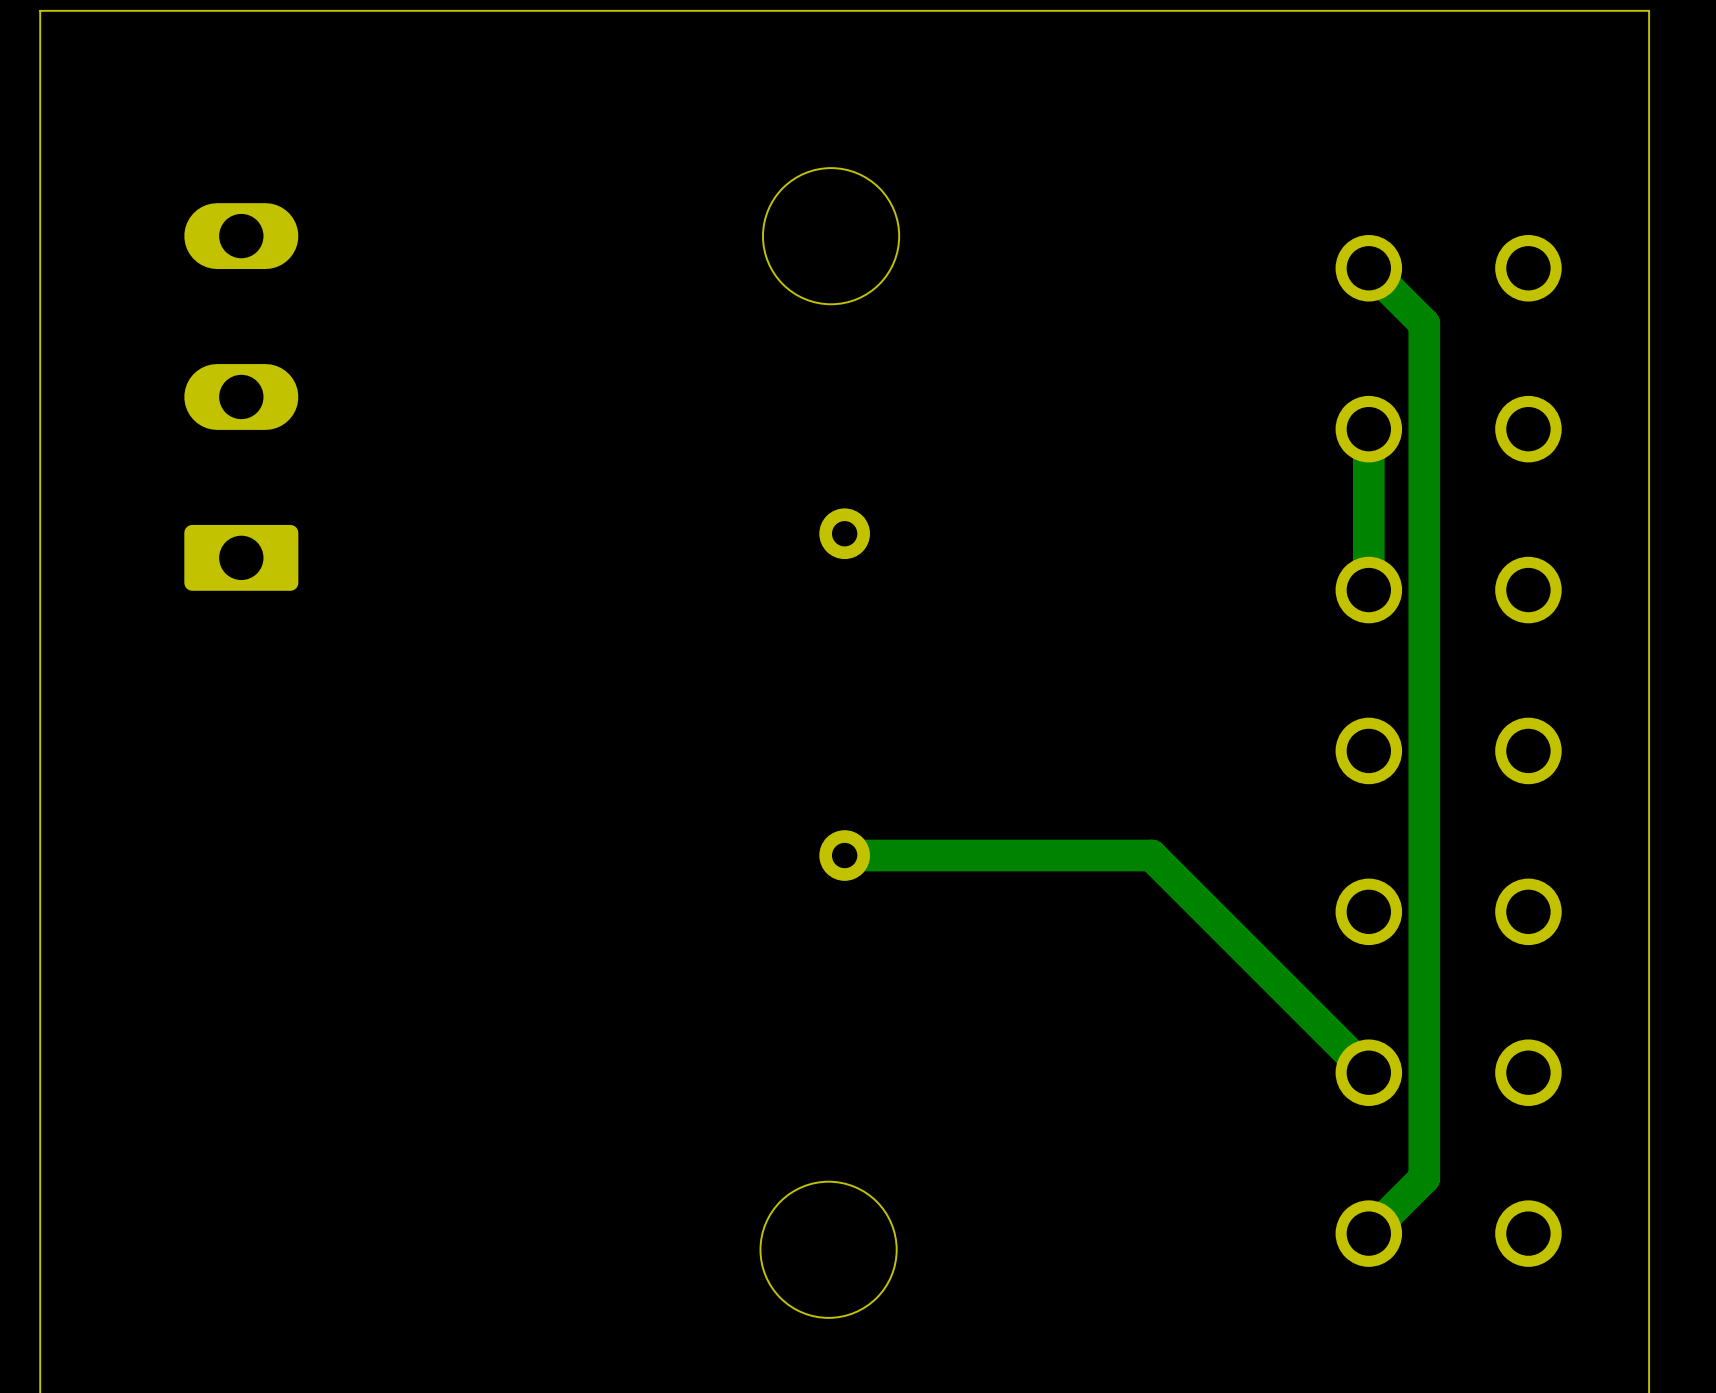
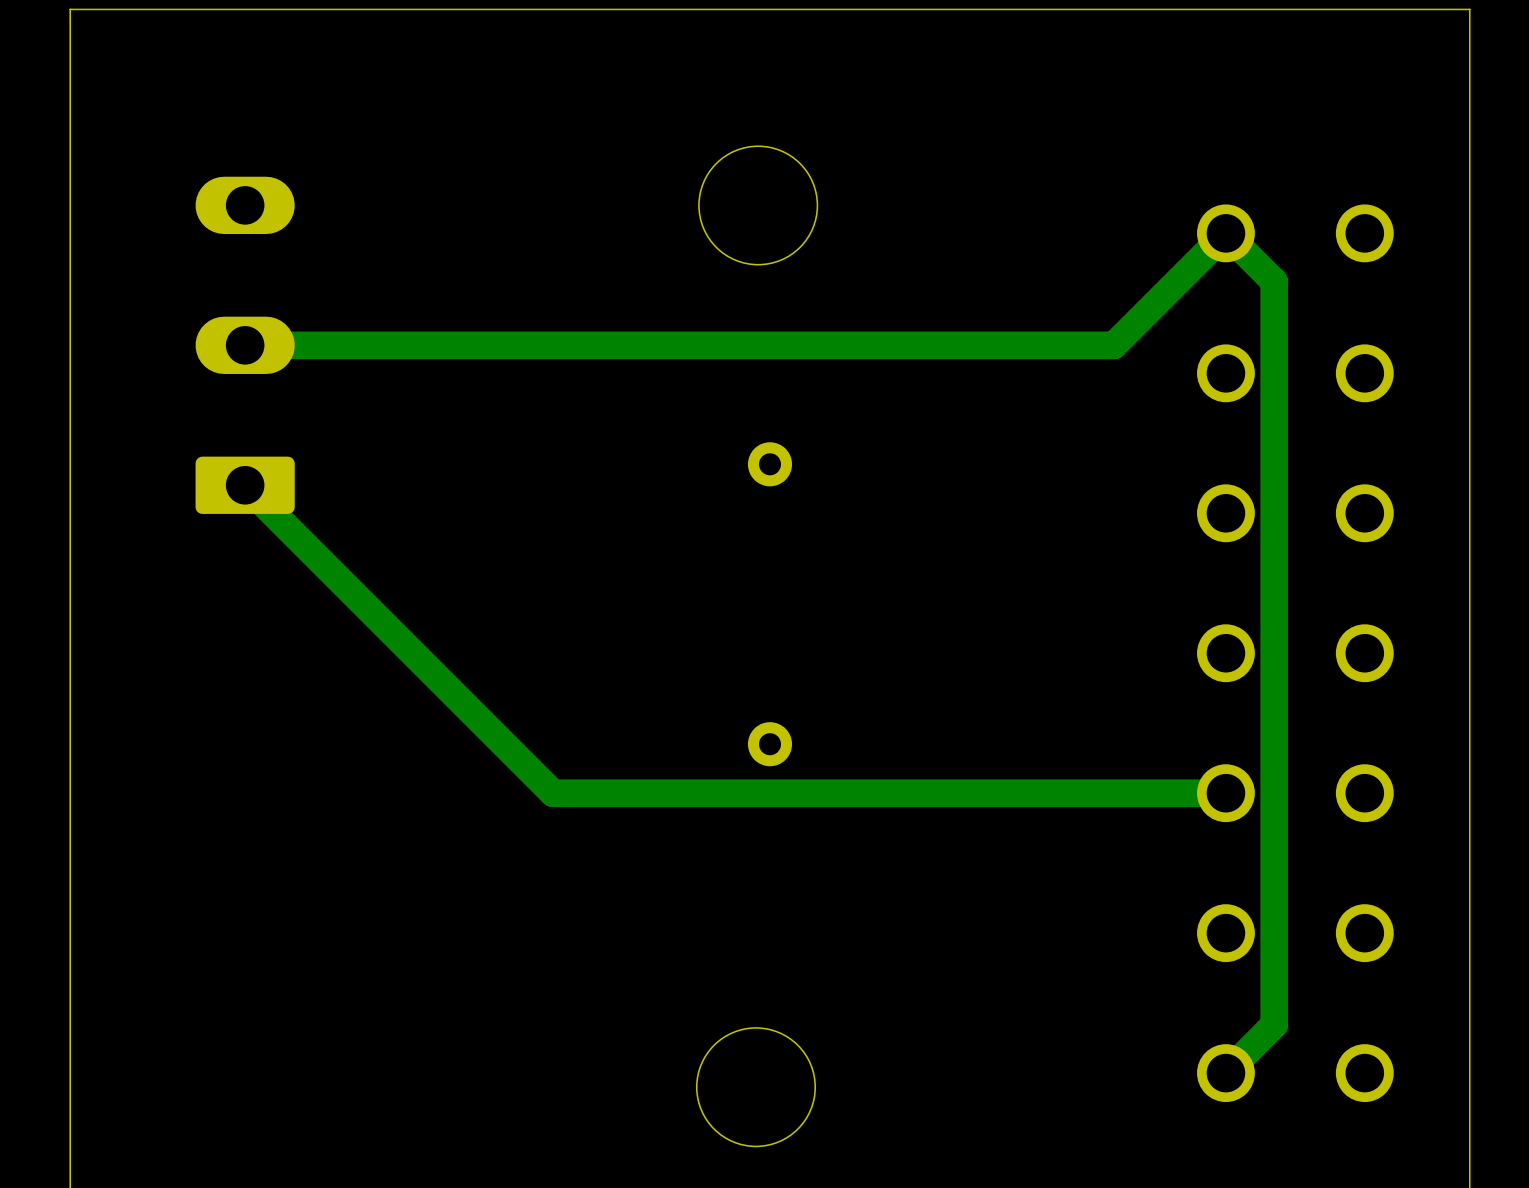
track: none -> (1225, 233) (1113, 345) (245, 345)
track: (1368, 429) (1368, 590) -> none
track: none -> (245, 485) (553, 793) (1225, 793)
track: (844, 855) (1151, 855) (1368, 1072) -> none

